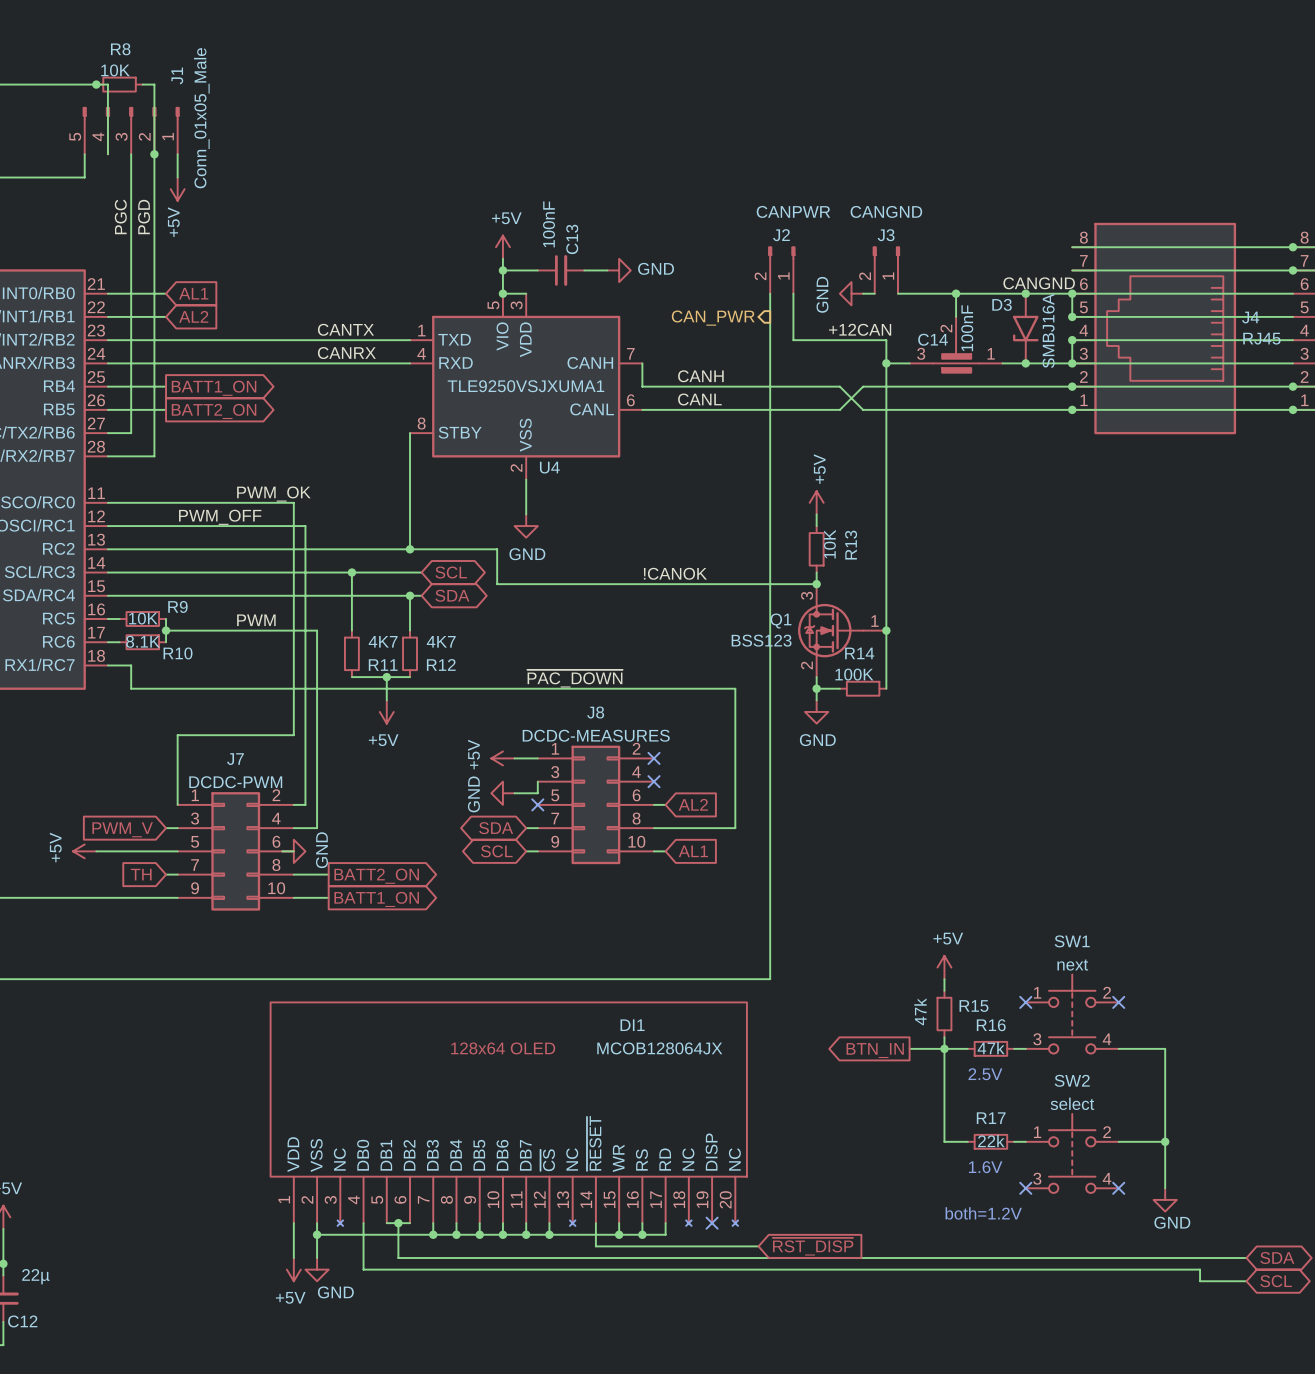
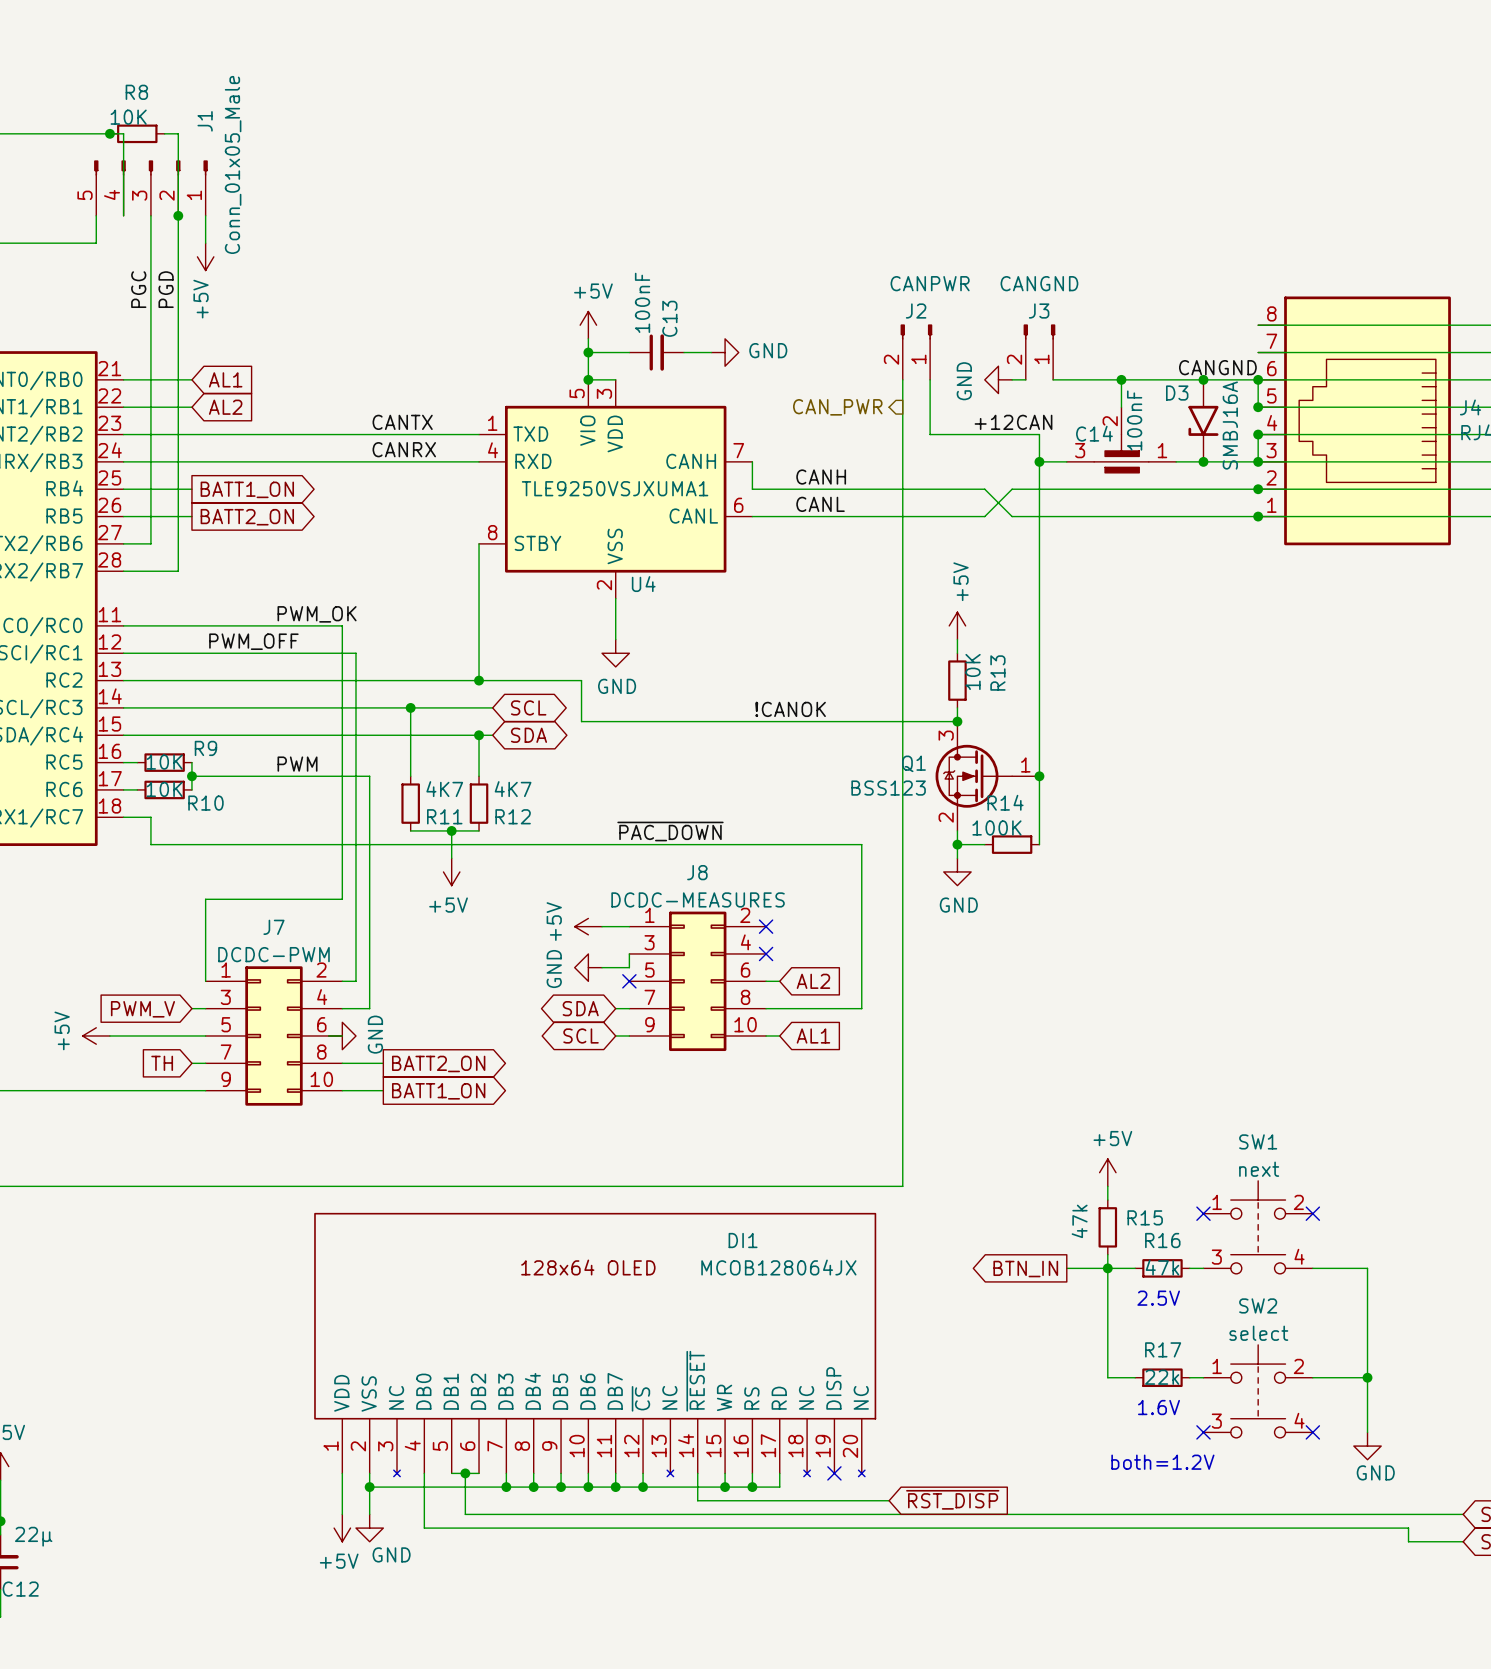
R10 value: 8.1K (143, 641) -> 10K (164, 789)

